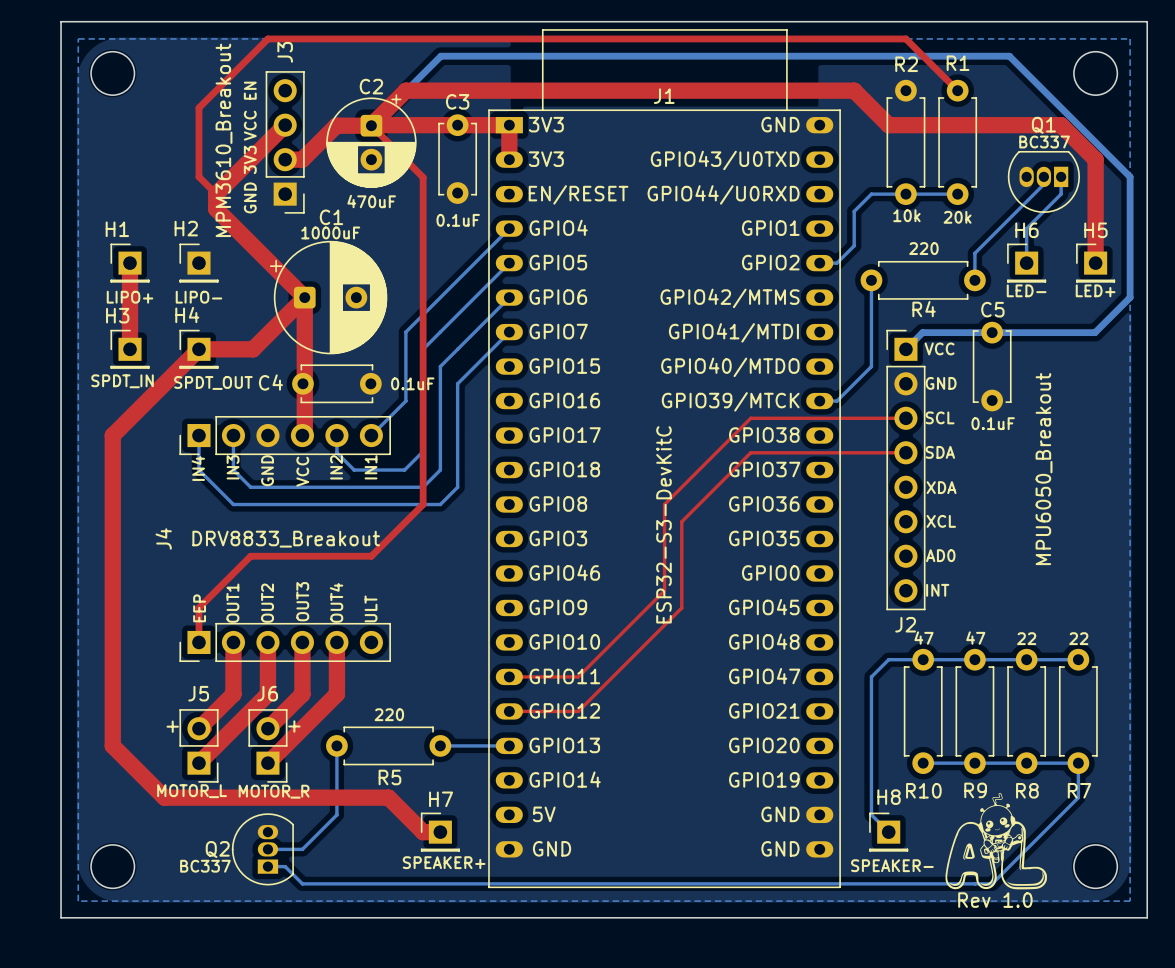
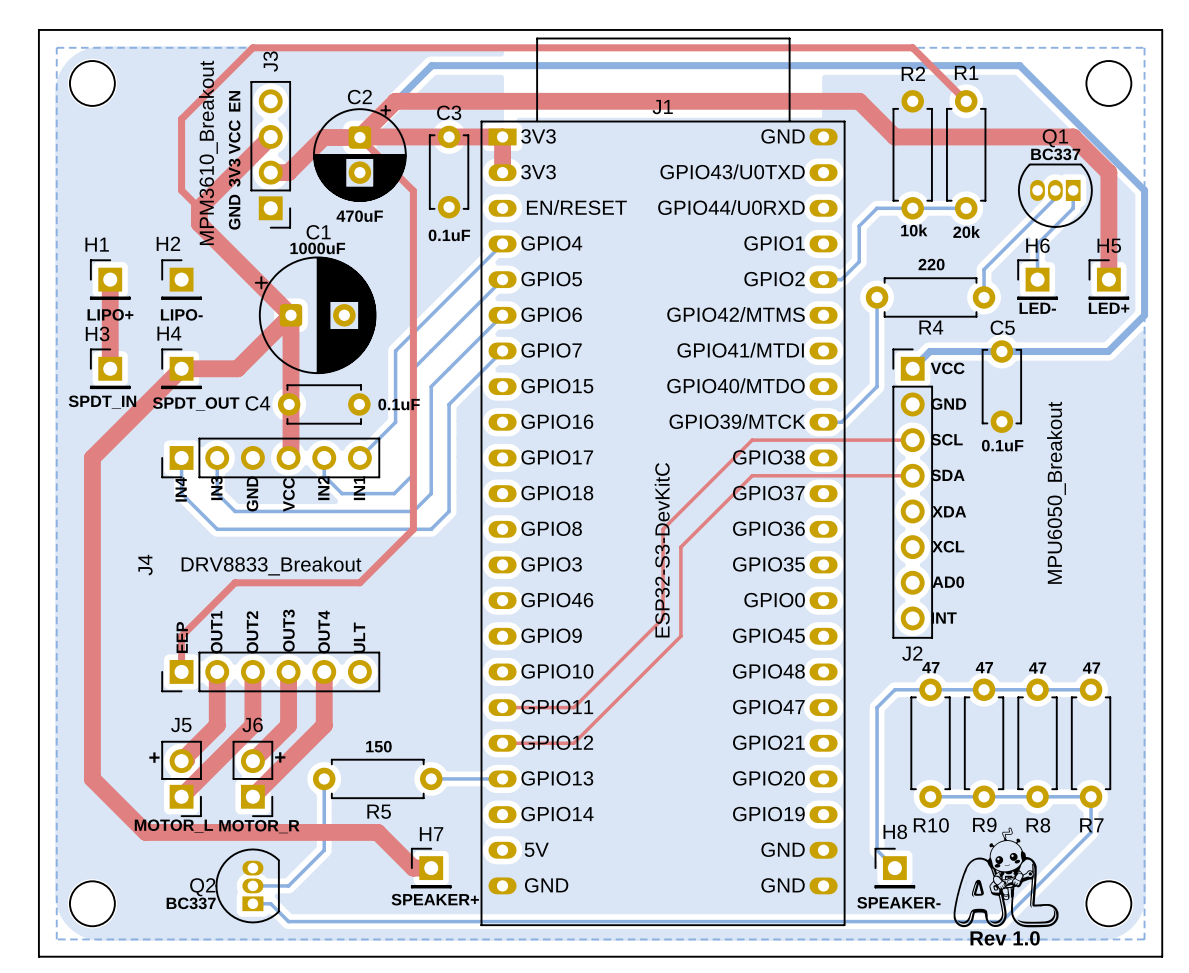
text: 22 (1026, 638) -> 47 (1037, 668)
text: 22 (1078, 638) -> 47 (1091, 668)
text: 220 (389, 714) -> 150 (378, 746)

